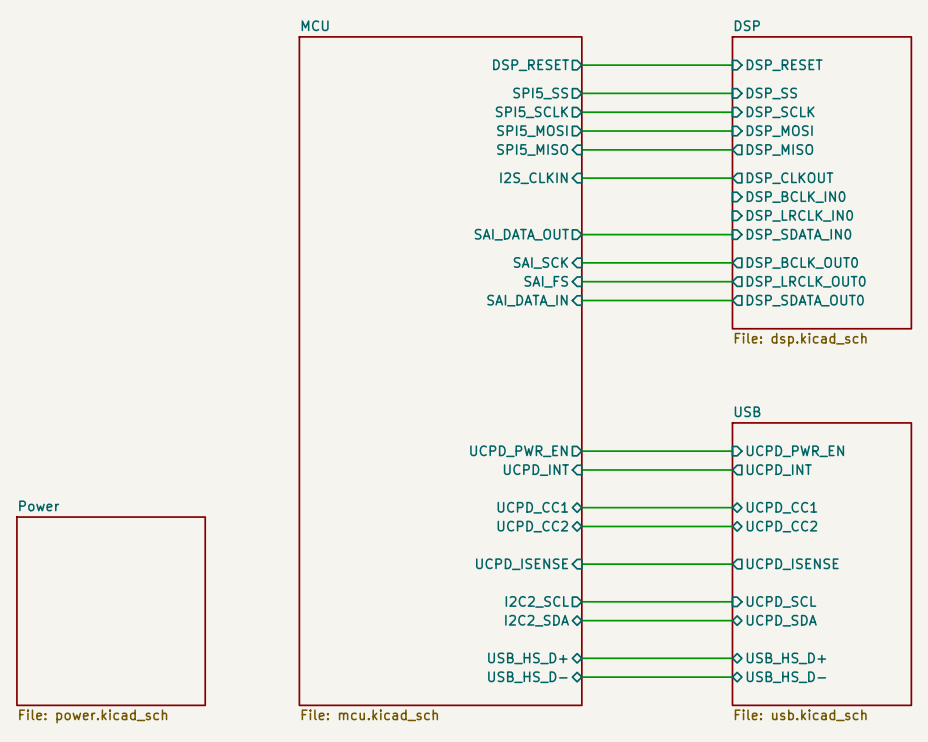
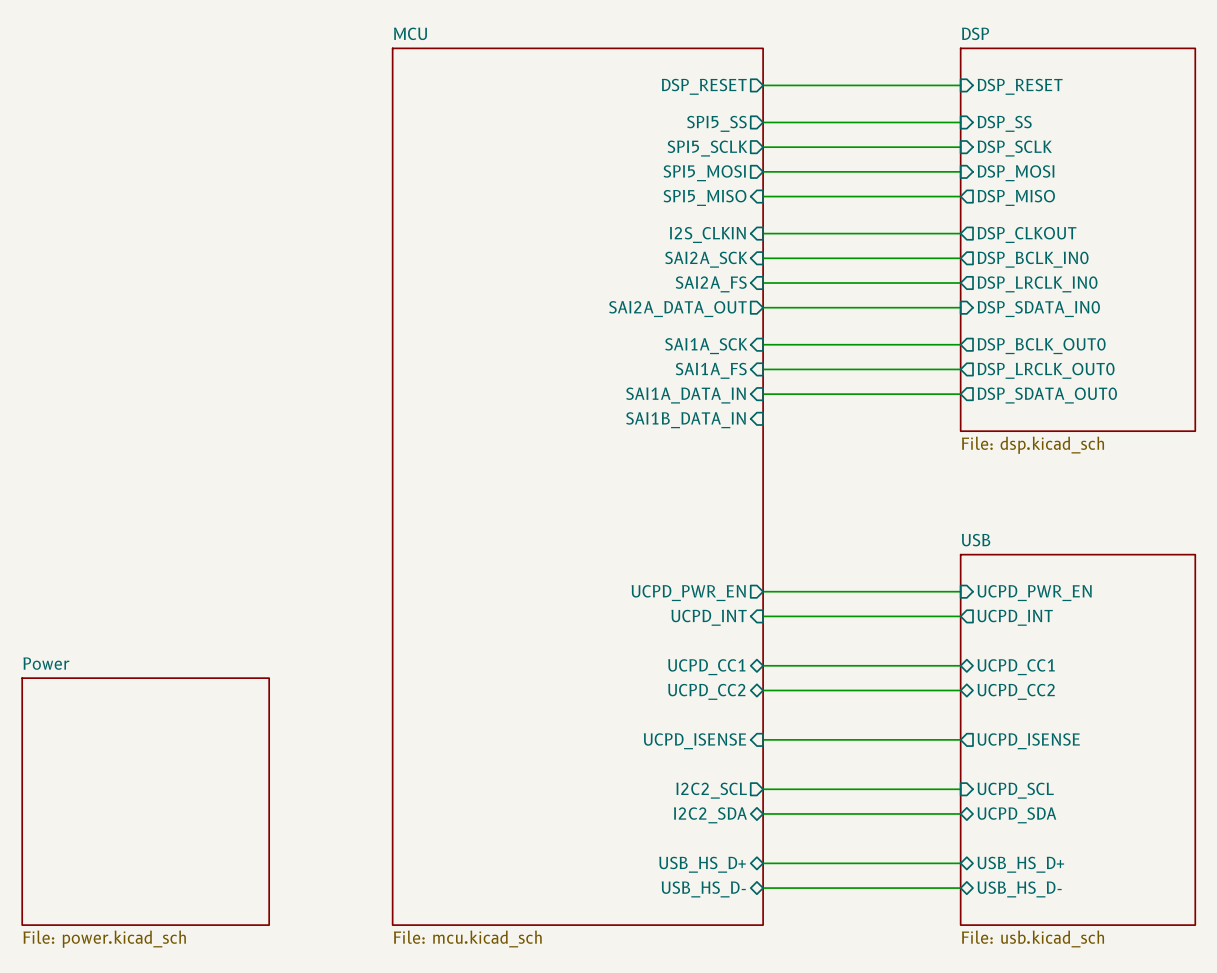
wire: none -> (763, 258) (960, 258)
sheet pin: none -> SAI2A_SCK (706, 259)
sheet pin shape: input (796, 197) -> output (1033, 259)
sheet pin: none -> SAI2A_FS (711, 284)
wire: none -> (763, 282) (960, 282)
sheet pin shape: input (799, 215) -> output (1037, 284)
sheet pin: SAI_DATA_OUT (521, 234) -> SAI2A_DATA_OUT (677, 309)
sheet pin: SAI_SCK (540, 262) -> SAI1A_SCK (706, 346)
sheet pin: SAI_FS (546, 281) -> SAI1A_FS (711, 370)
sheet pin: SAI_DATA_IN (527, 300) -> SAI1A_DATA_IN (685, 395)
sheet pin: none -> SAI1B_DATA_IN (685, 420)

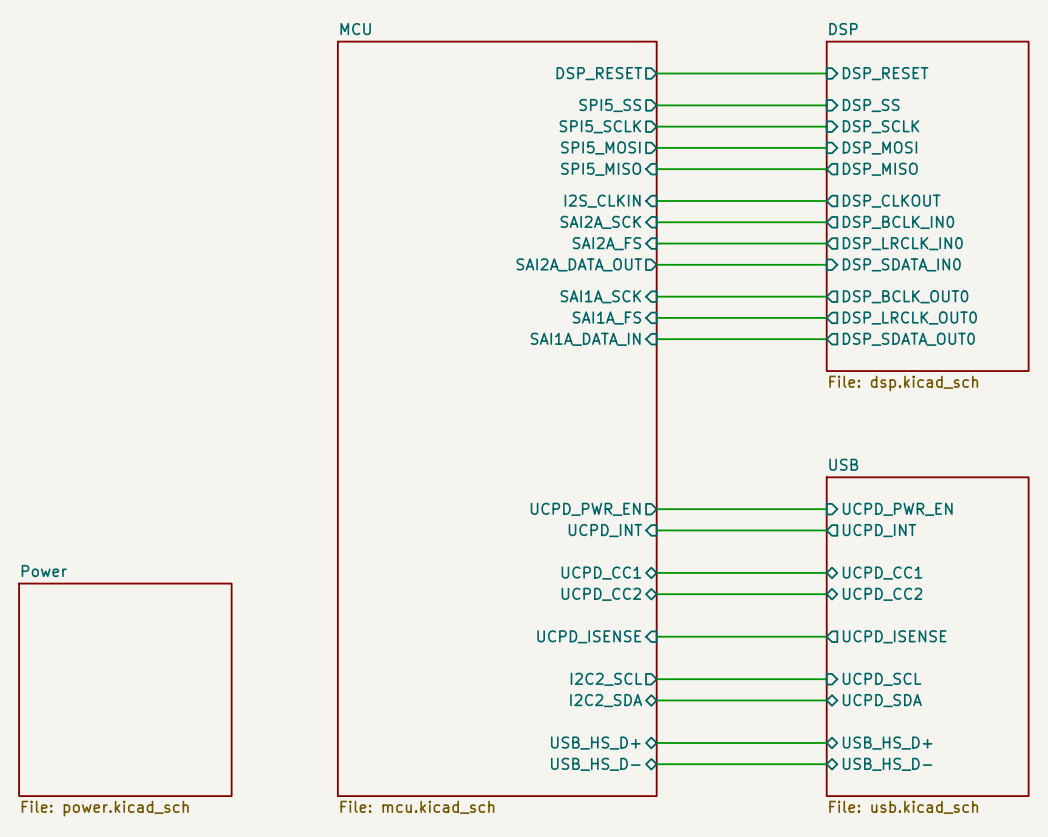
sheet pin: SAI1B_DATA_IN (685, 420) -> none

